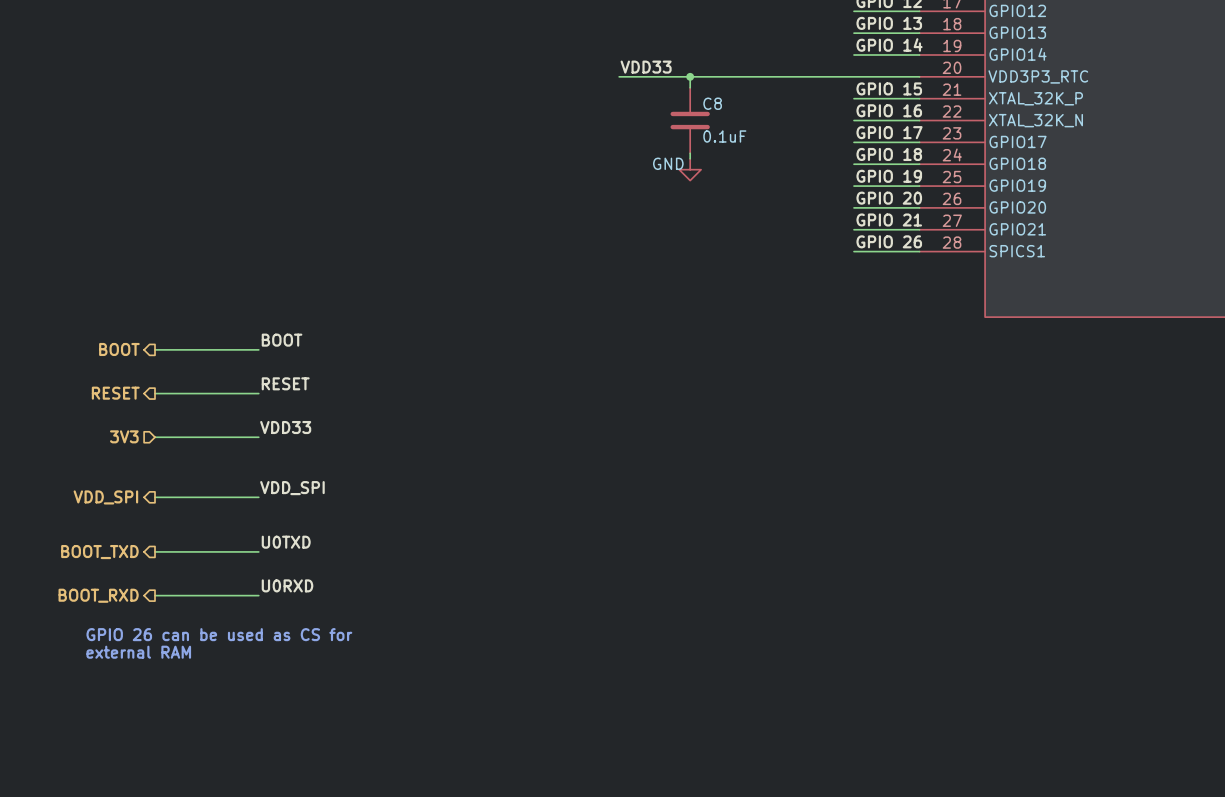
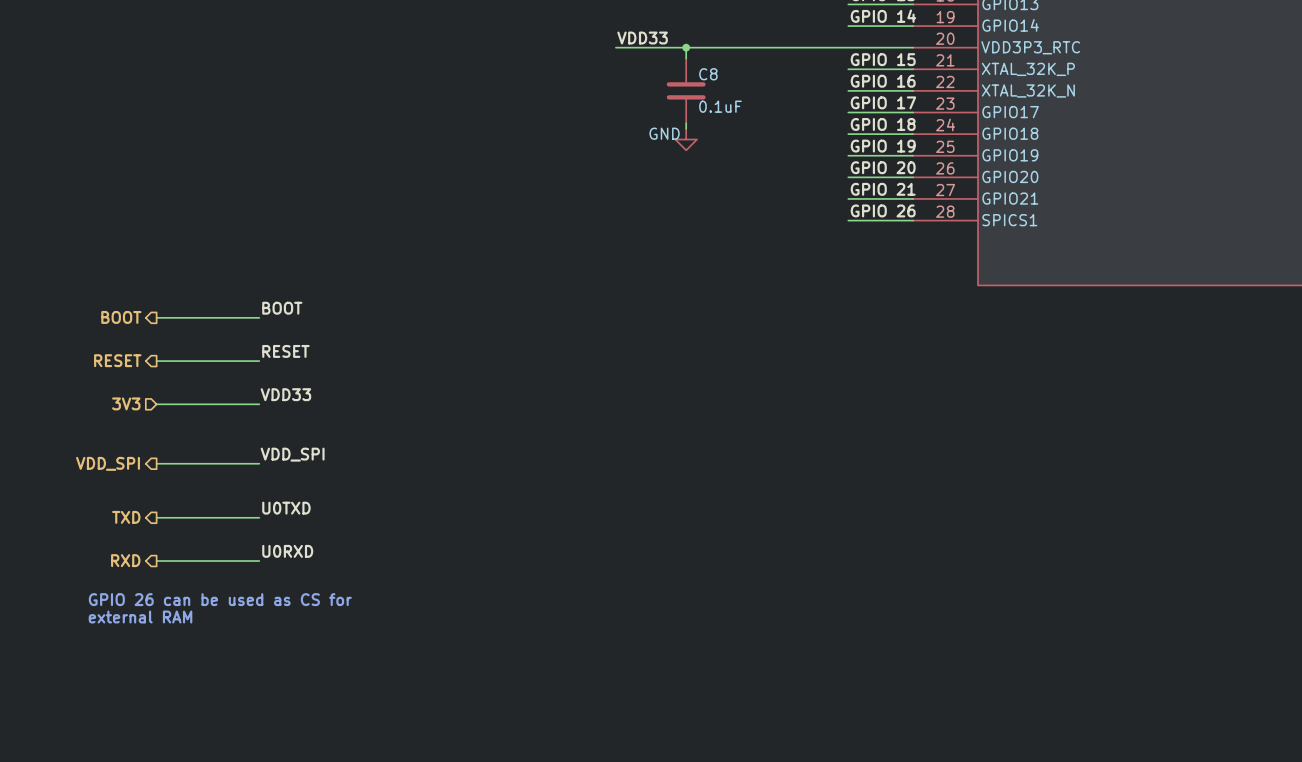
hierarchical label: BOOT_TXD (99, 552) -> TXD (126, 517)
hierarchical label: BOOT_RXD (98, 595) -> RXD (125, 560)

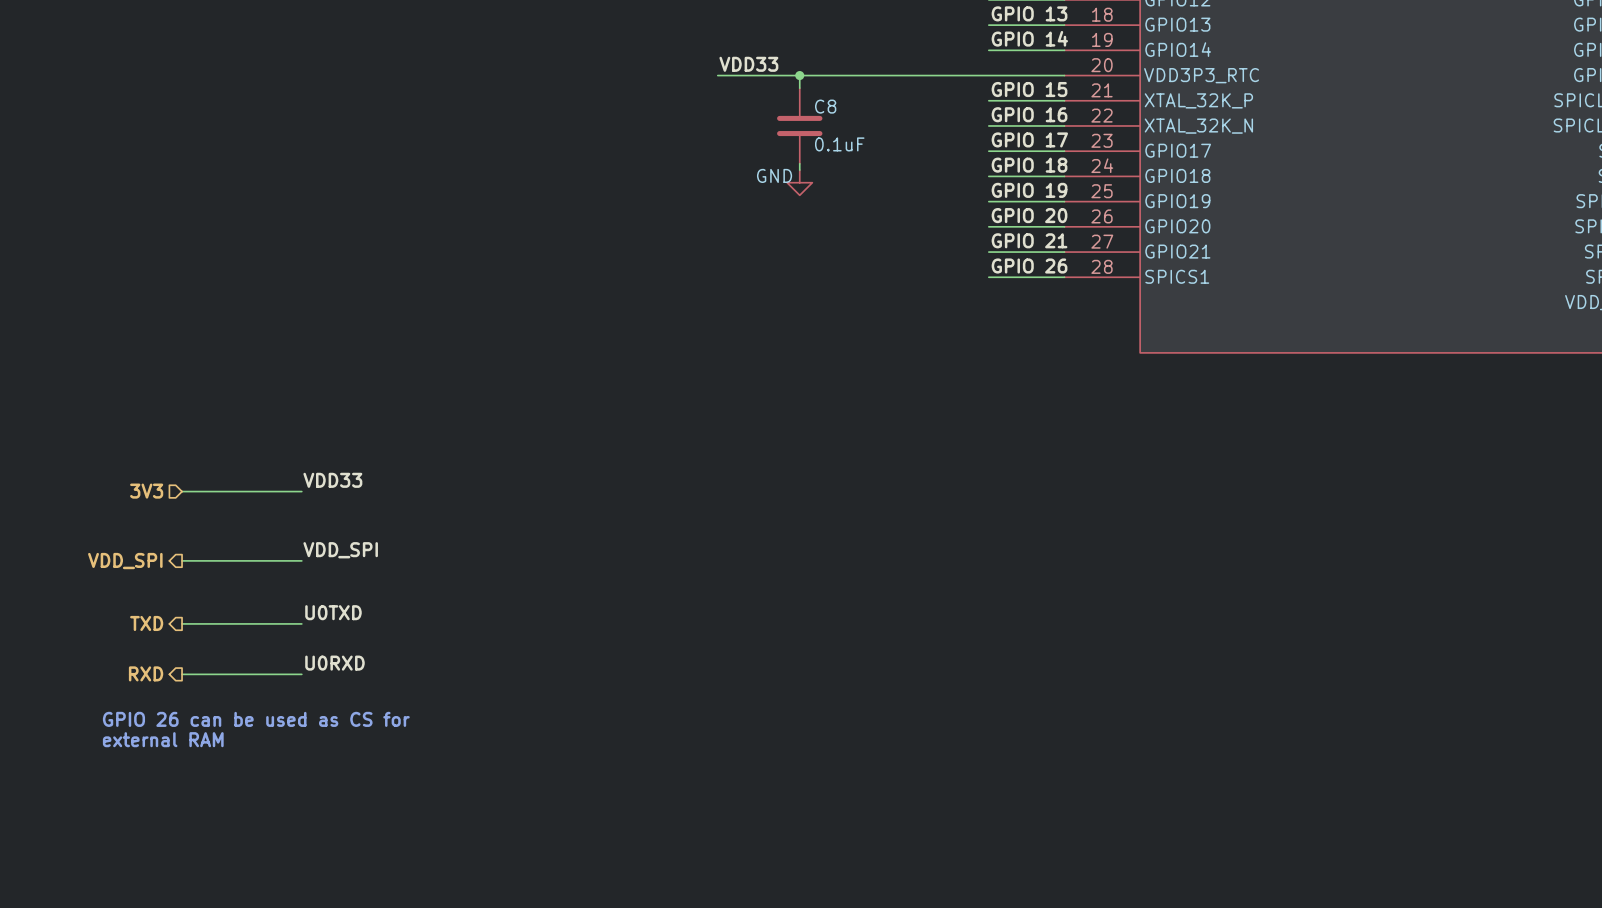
label: BOOT (282, 308) -> none
hierarchical label: BOOT (121, 317) -> none
wire: (156, 317) (259, 317) -> none
label: RESET (285, 351) -> none
hierarchical label: RESET (117, 360) -> none
wire: (156, 361) (259, 361) -> none

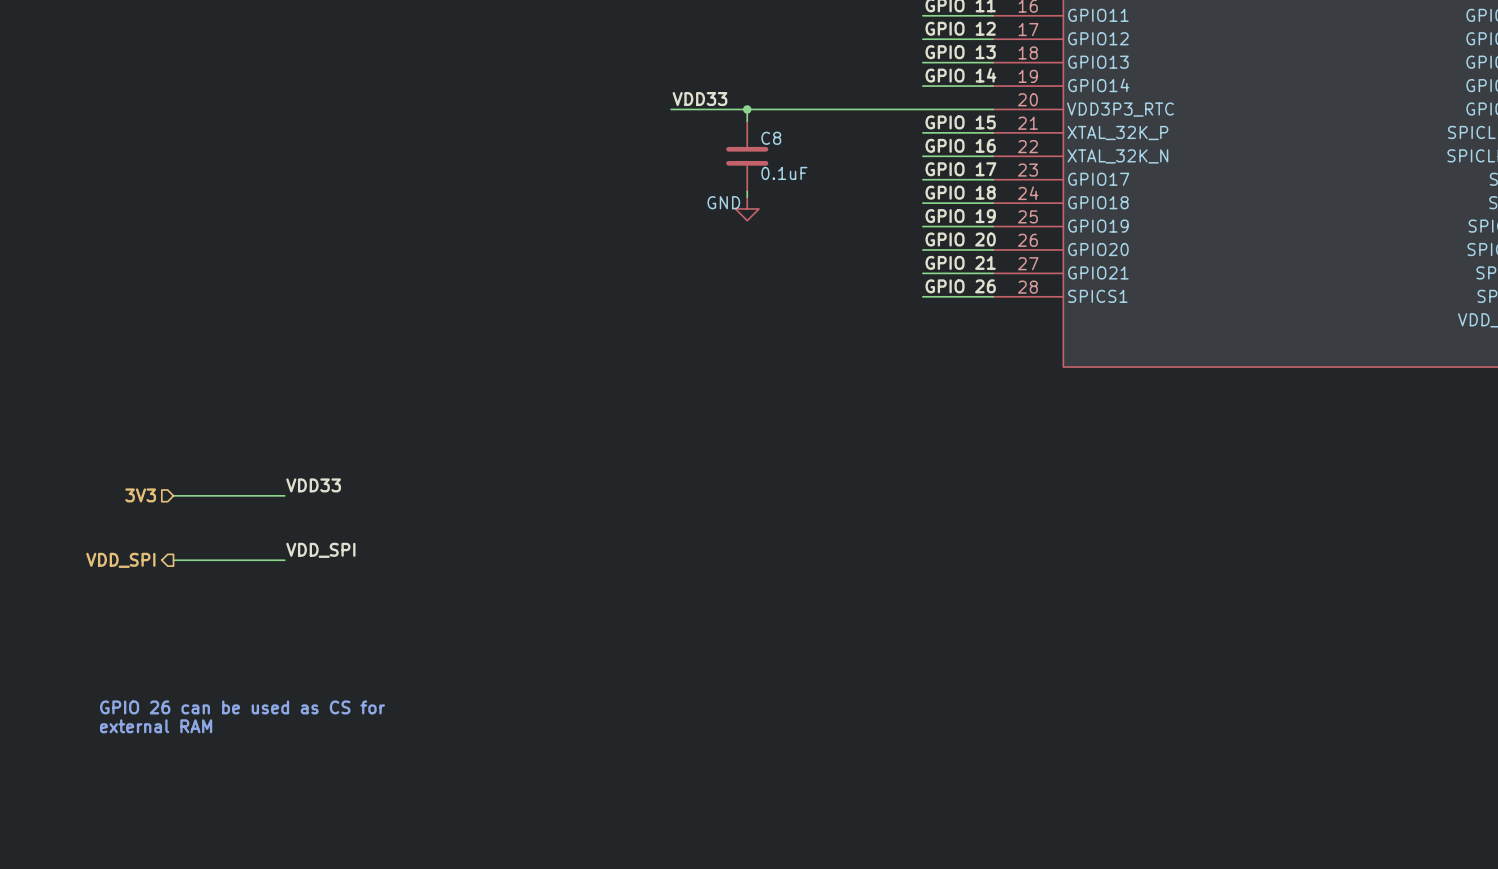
label: U0TXD (333, 612) -> none
hierarchical label: TXD (146, 623) -> none
wire: (182, 623) (301, 623) -> none
label: U0RXD (334, 663) -> none
hierarchical label: RXD (146, 673) -> none
wire: (182, 674) (301, 674) -> none

